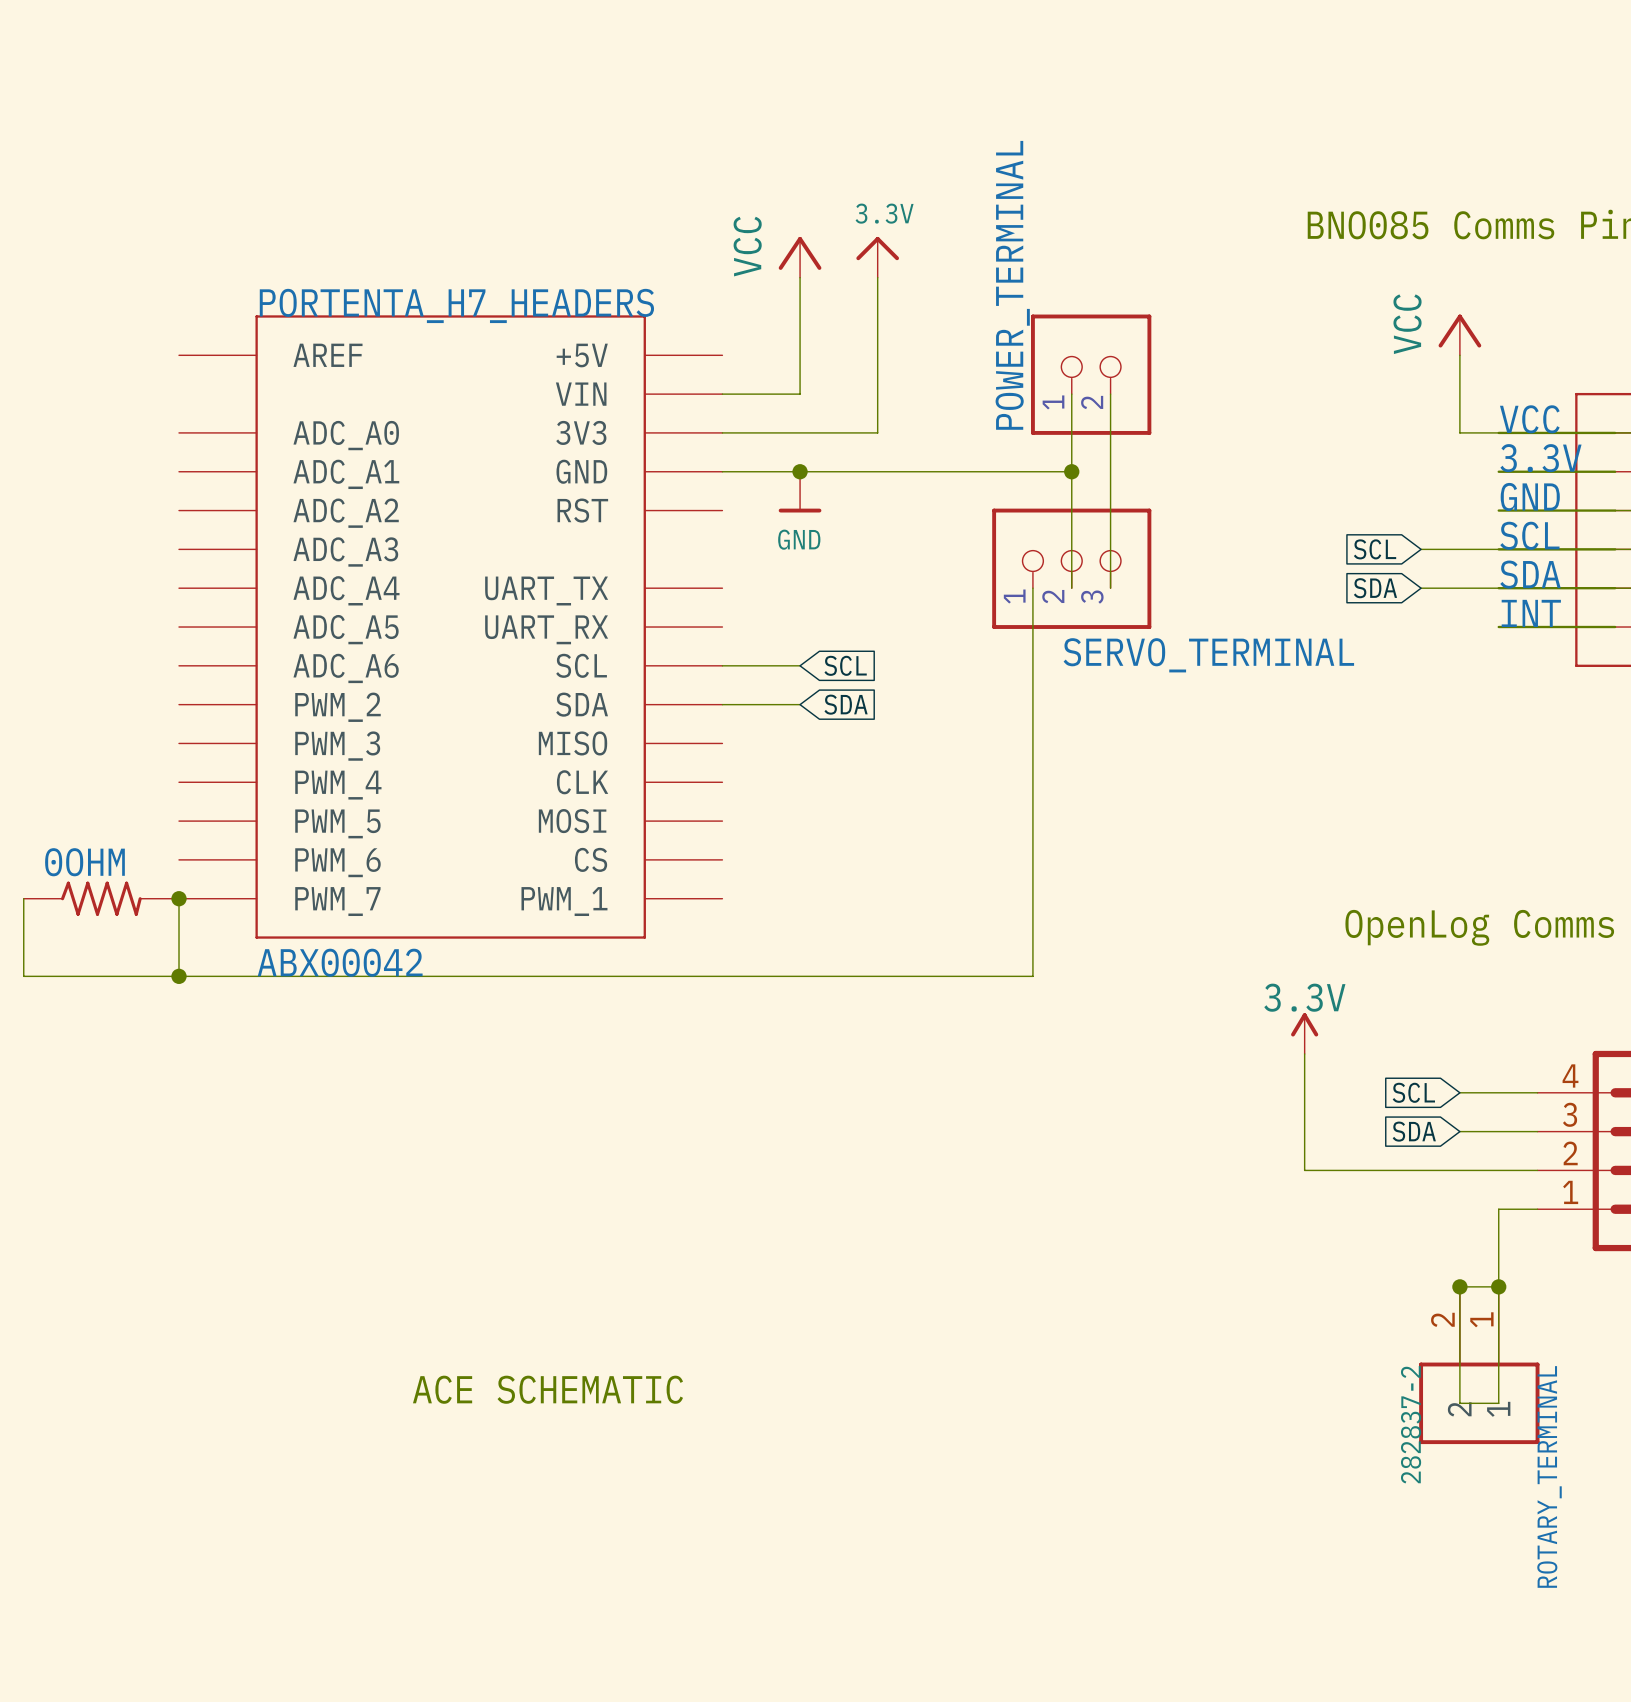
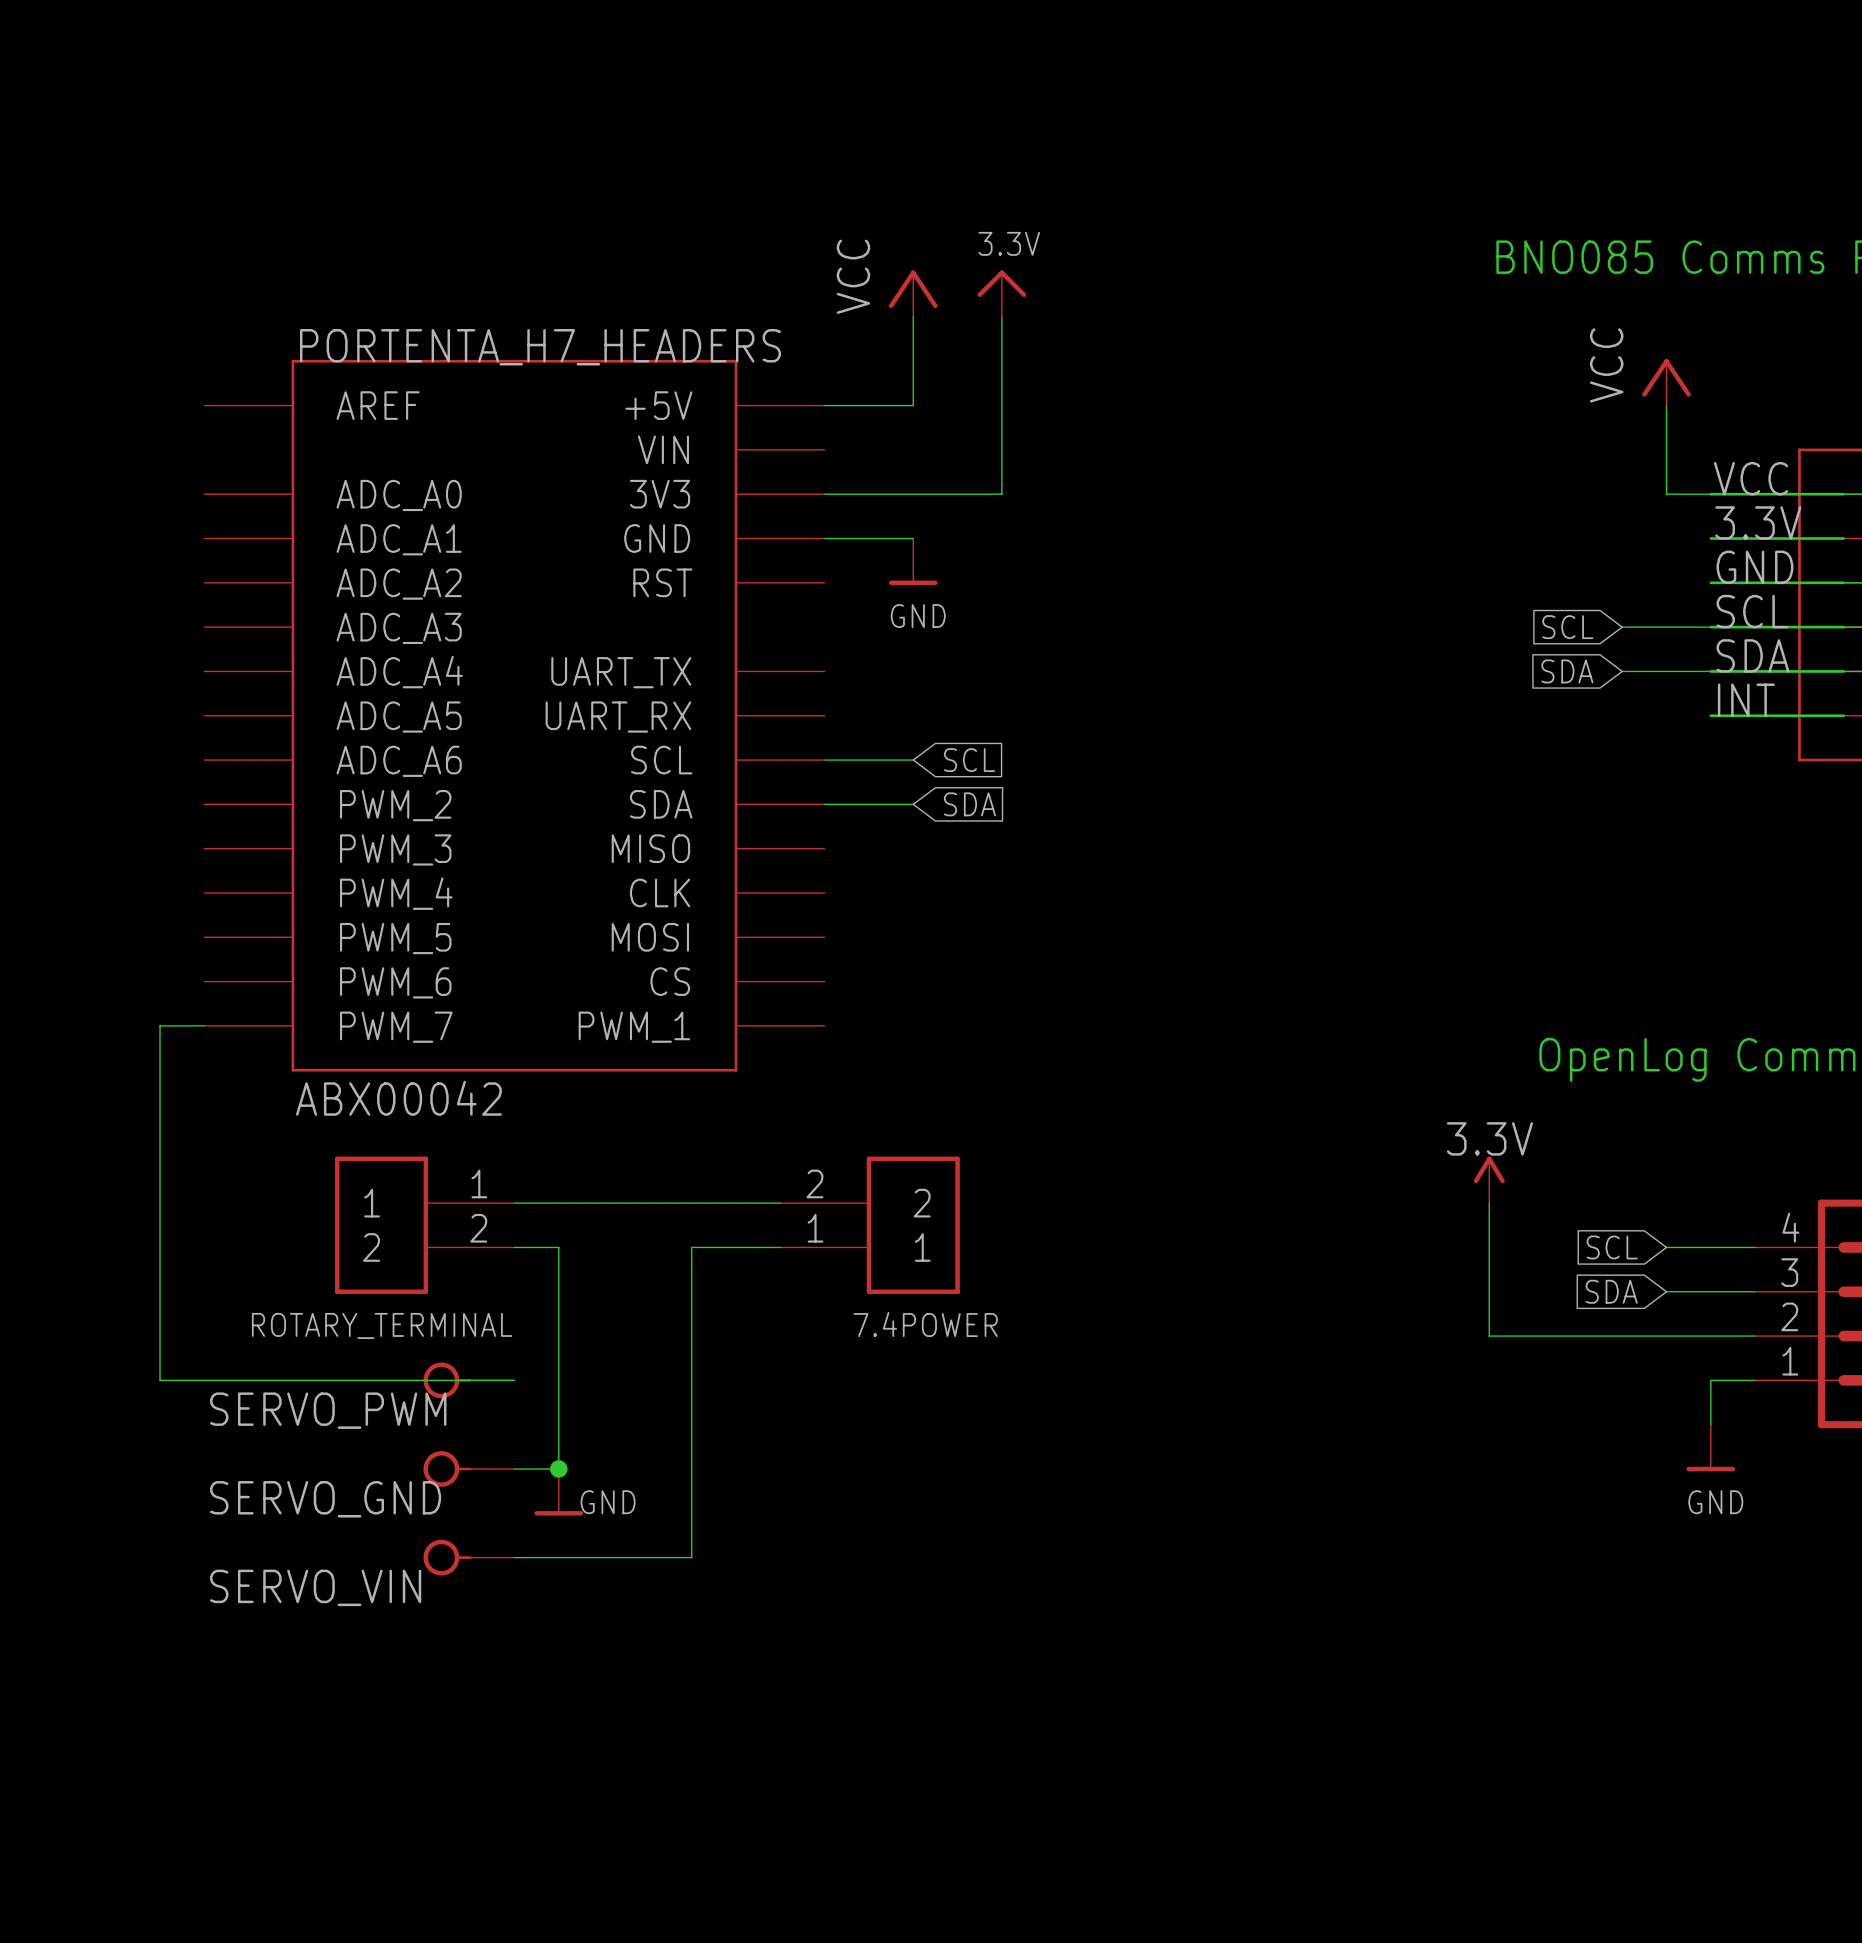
wire: (800, 355) (800, 394) (722, 394) -> (913, 405) (824, 405)
POWER_TERMINAL: (1091, 374) -> none
wire: (1071, 394) (1071, 588) -> none
wire: (1110, 394) (1110, 588) -> none
wire: (800, 471) (1071, 471) -> none
junction: (800, 471) -> none
junction: (1071, 471) -> none
SERVO_TERMINAL: (1071, 568) -> none
wire: (1032, 588) (1032, 976) (23, 976) (23, 898) -> none
0OHM: (101, 898) -> none
wire: (179, 898) (179, 976) -> (204, 1025) (160, 1025) (160, 1380) (514, 1380)
junction: (179, 898) -> none
junction: (179, 976) -> none
wire: none -> (514, 1203) (780, 1203)
ROTARY_TERMINAL: none -> (424, 1225)
7.4POWER: none -> (870, 1225)
wire: none -> (514, 1247) (558, 1247) (558, 1468) (514, 1468)
wire: none -> (780, 1247) (691, 1247) (691, 1557) (514, 1557)
part: none -> (469, 1380)
label: none -> SERVO_PWM (328, 1410)
wire: (1498, 1248) (1498, 1403) (1459, 1403) (1459, 1286) (1498, 1286) -> none
power symbol: none -> GND (1710, 1447)
part: none -> (469, 1468)
junction: none -> (558, 1468)
junction: (1459, 1286) -> none
junction: (1498, 1286) -> none
power symbol: none -> GND (558, 1492)
label: none -> SERVO_GND (325, 1499)
part: none -> (469, 1557)
ROTARY_TERMINAL: 282837-2 (1479, 1365) -> none
text: ACE SCHEMATIC (547, 1389) -> none
label: none -> SERVO_VIN (315, 1587)

